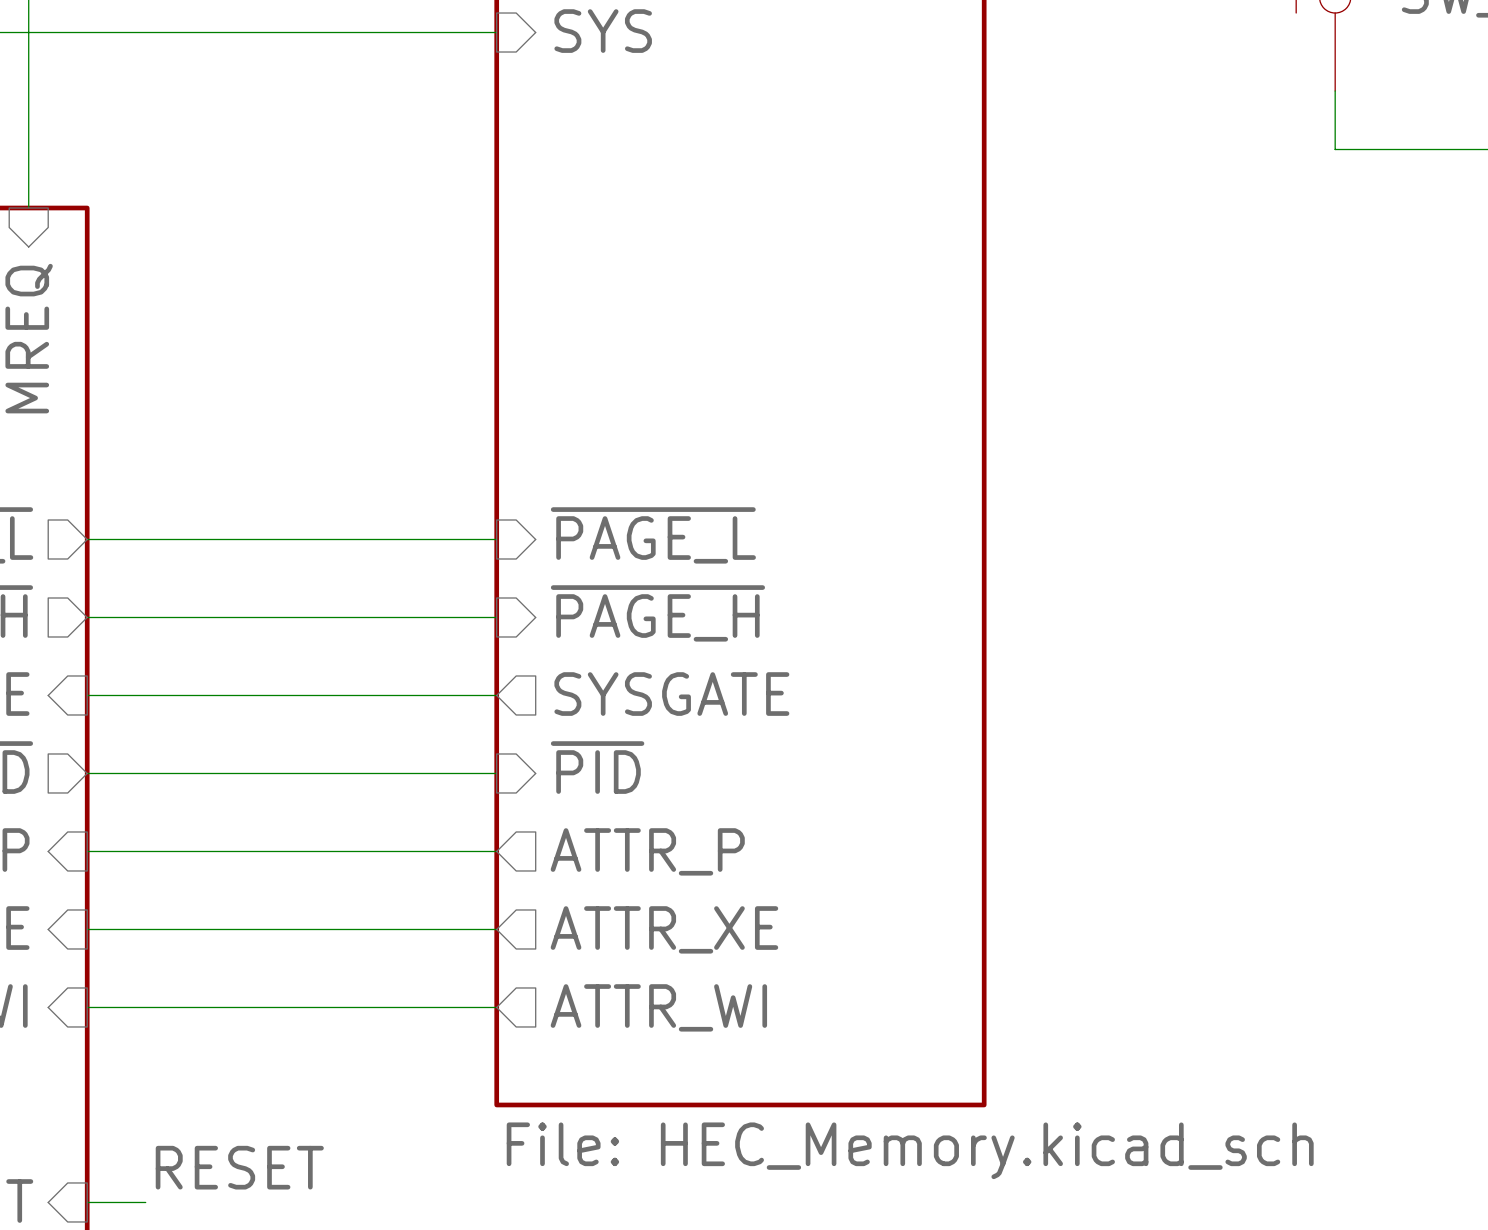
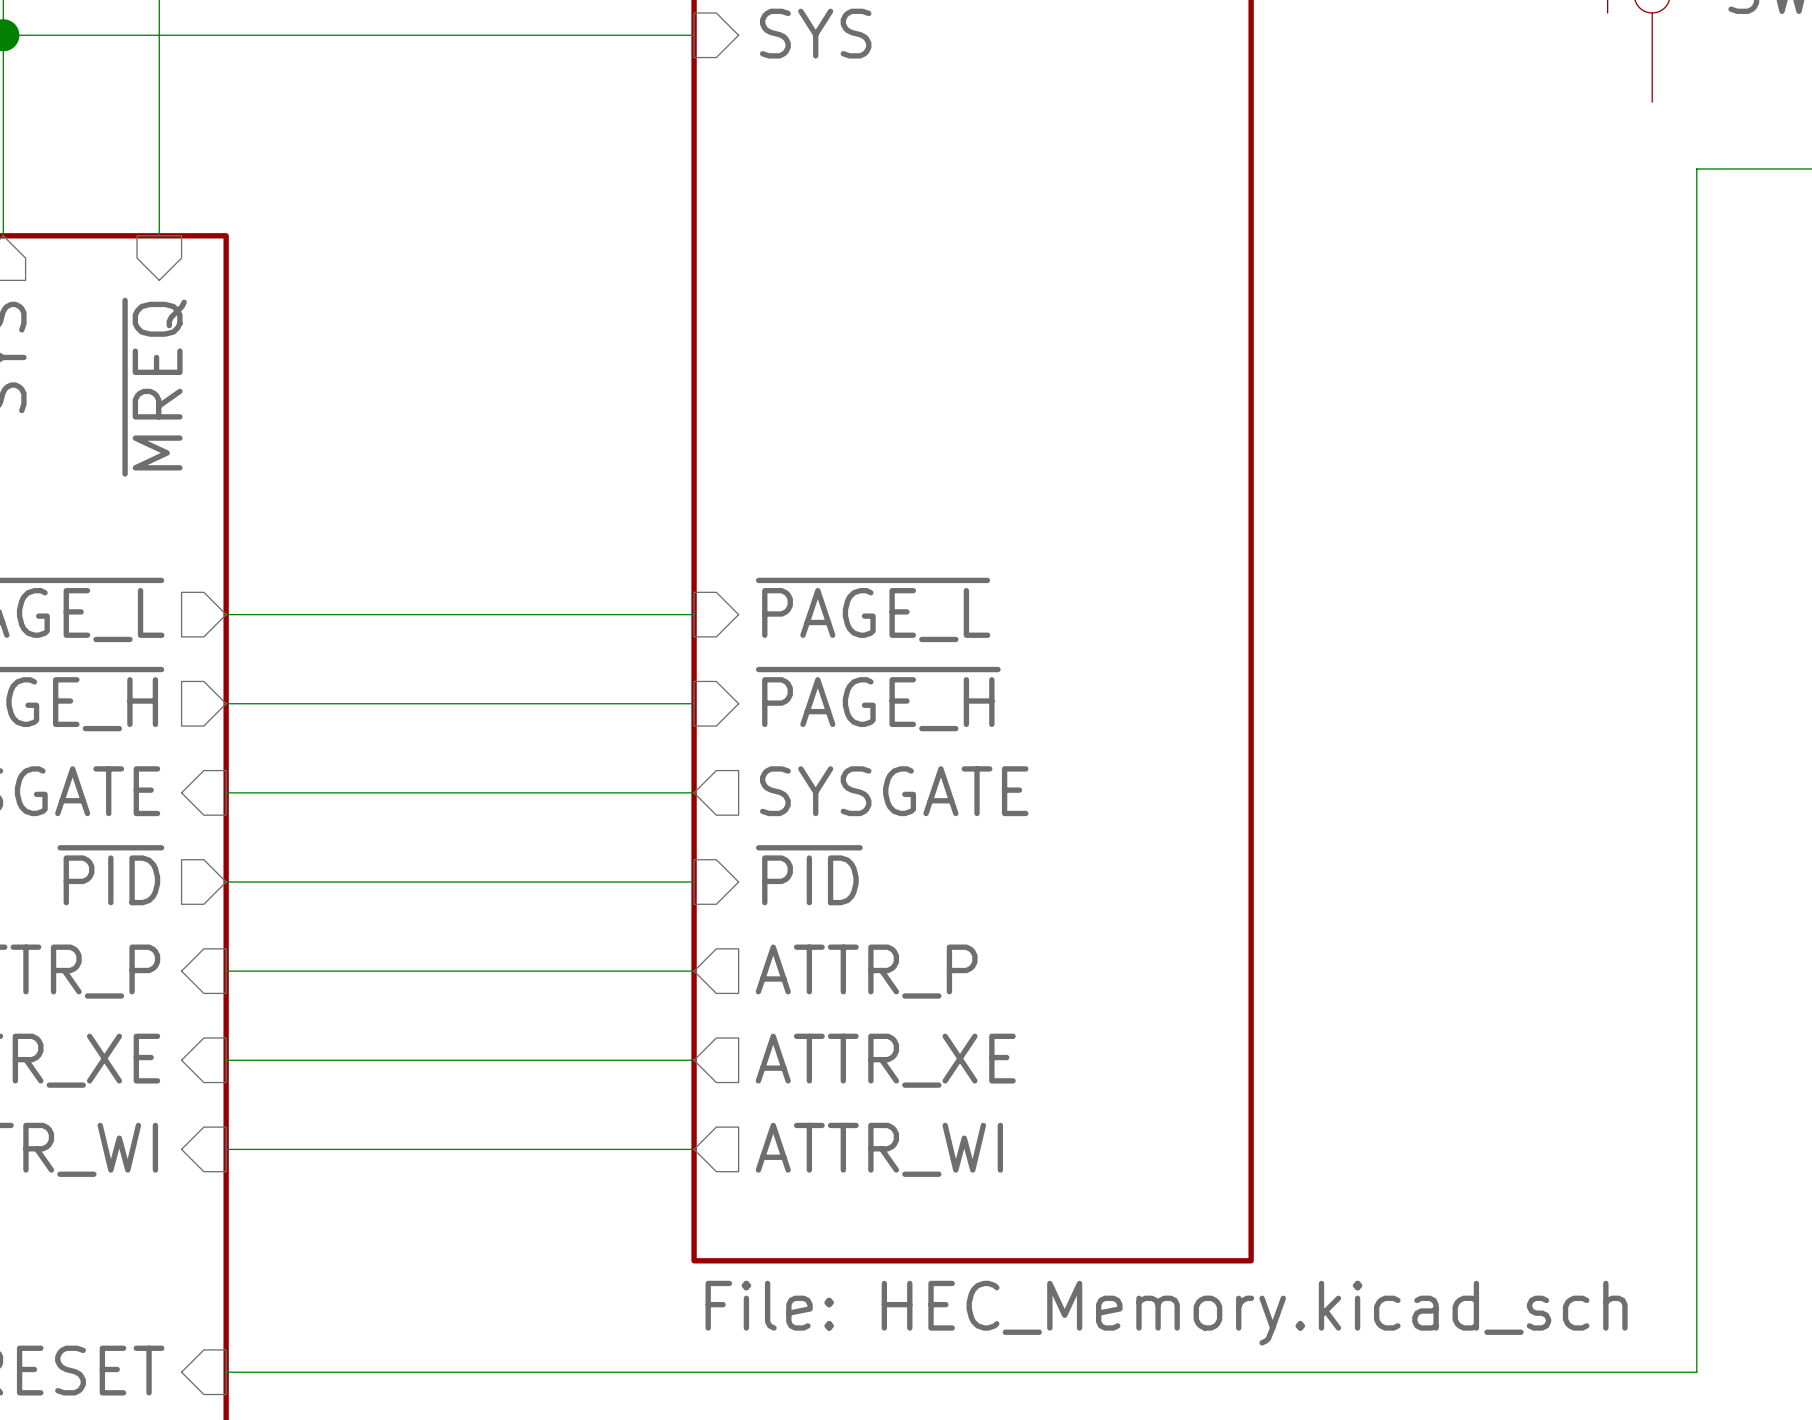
wire: (1335, 91) (1335, 149) (1374, 149) -> (292, 1372) (1696, 1372) (1696, 168)
label: RESET (239, 1167) -> none

